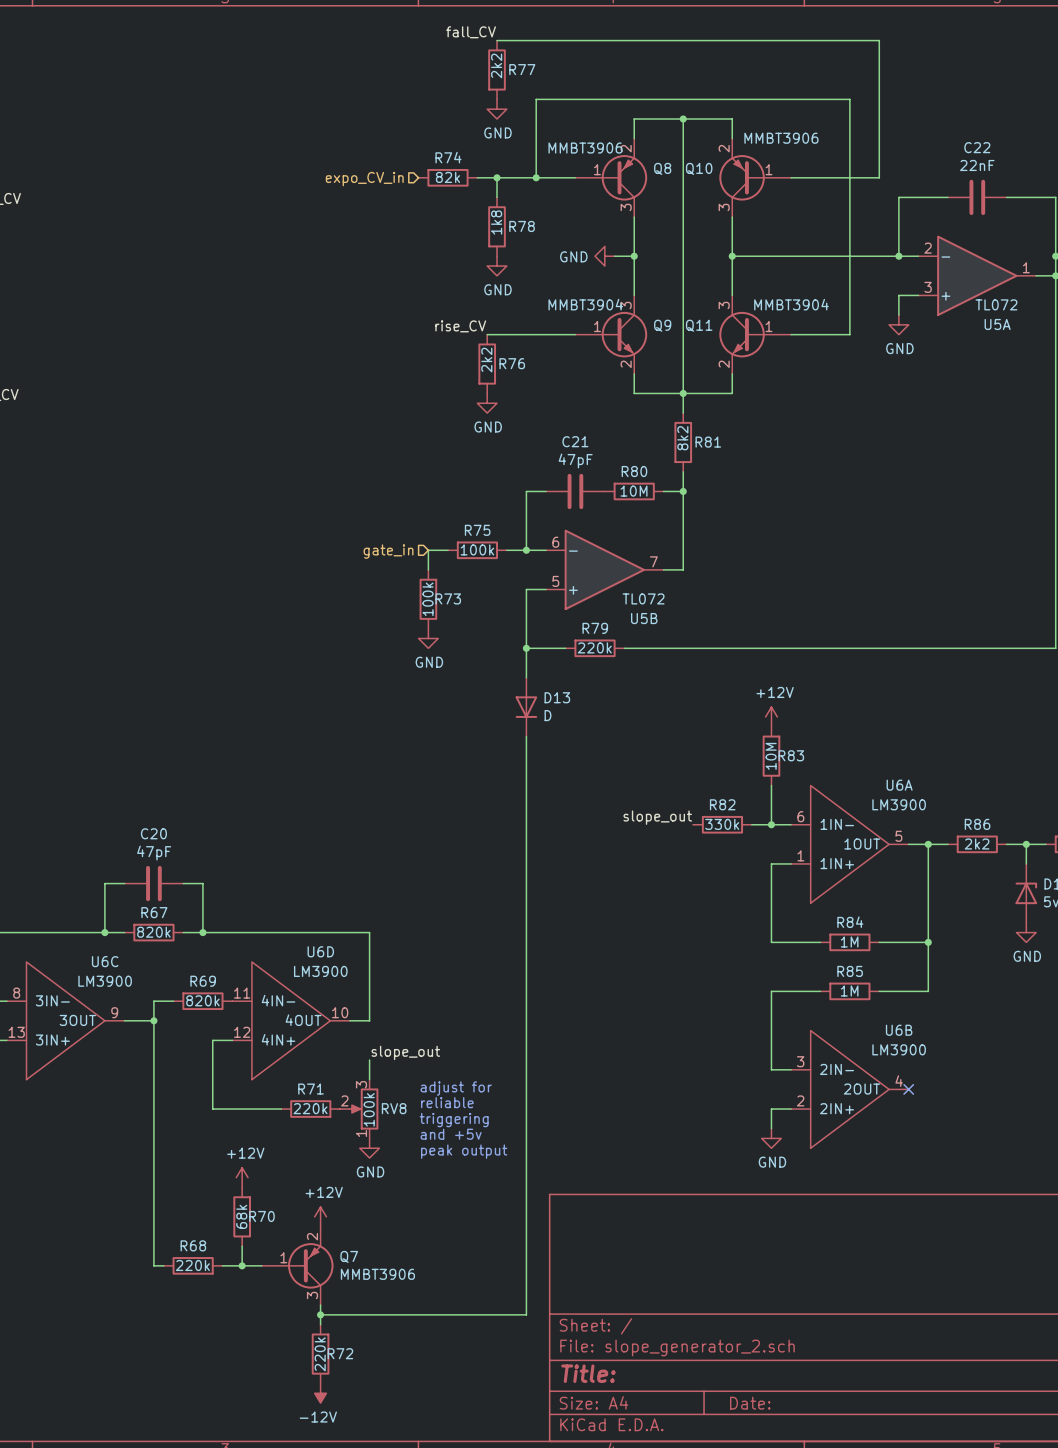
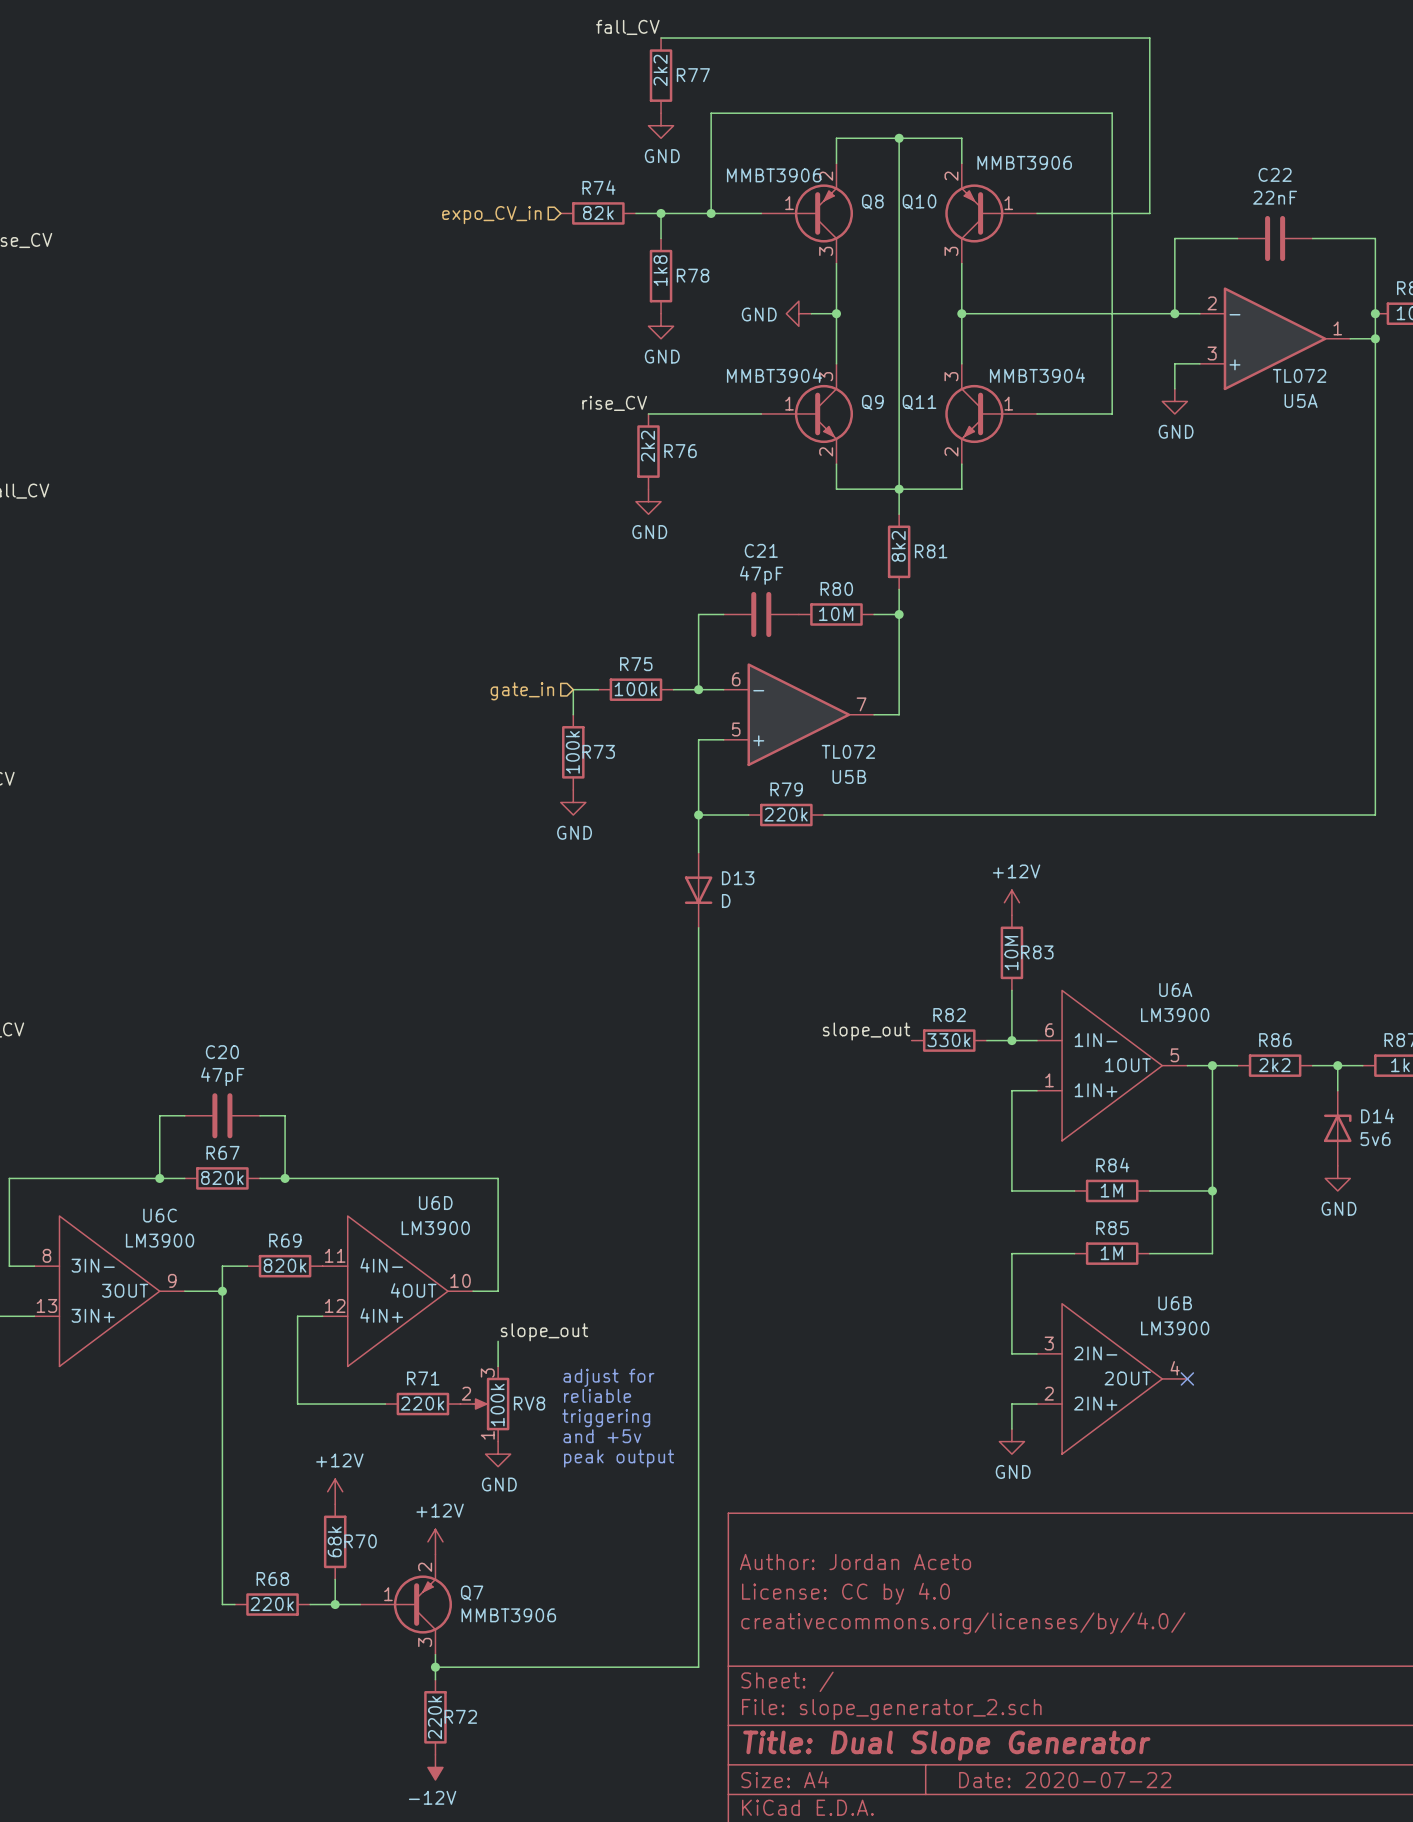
title block: none -> Author: Jordan Aceto (855, 1562)
title block: none -> License: CC by 4.0 (845, 1593)
title block: none -> creativecommons.org/licenses/by/4.0/ (963, 1623)
title block: Title: (588, 1373) -> Title: Dual Slope Generator (946, 1745)
title block: Date: (750, 1403) -> Date: 2020-07-22 (1065, 1780)

